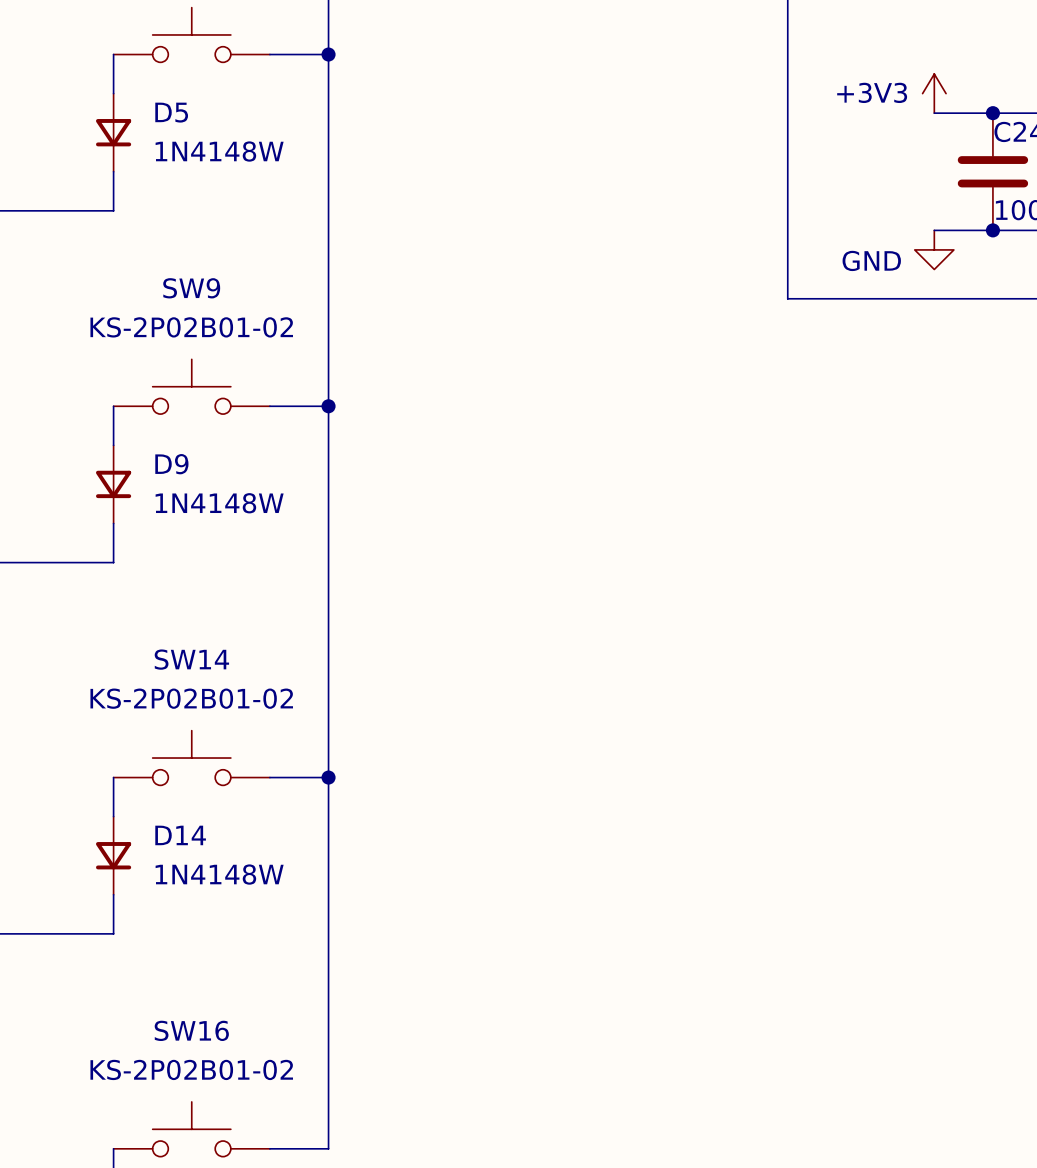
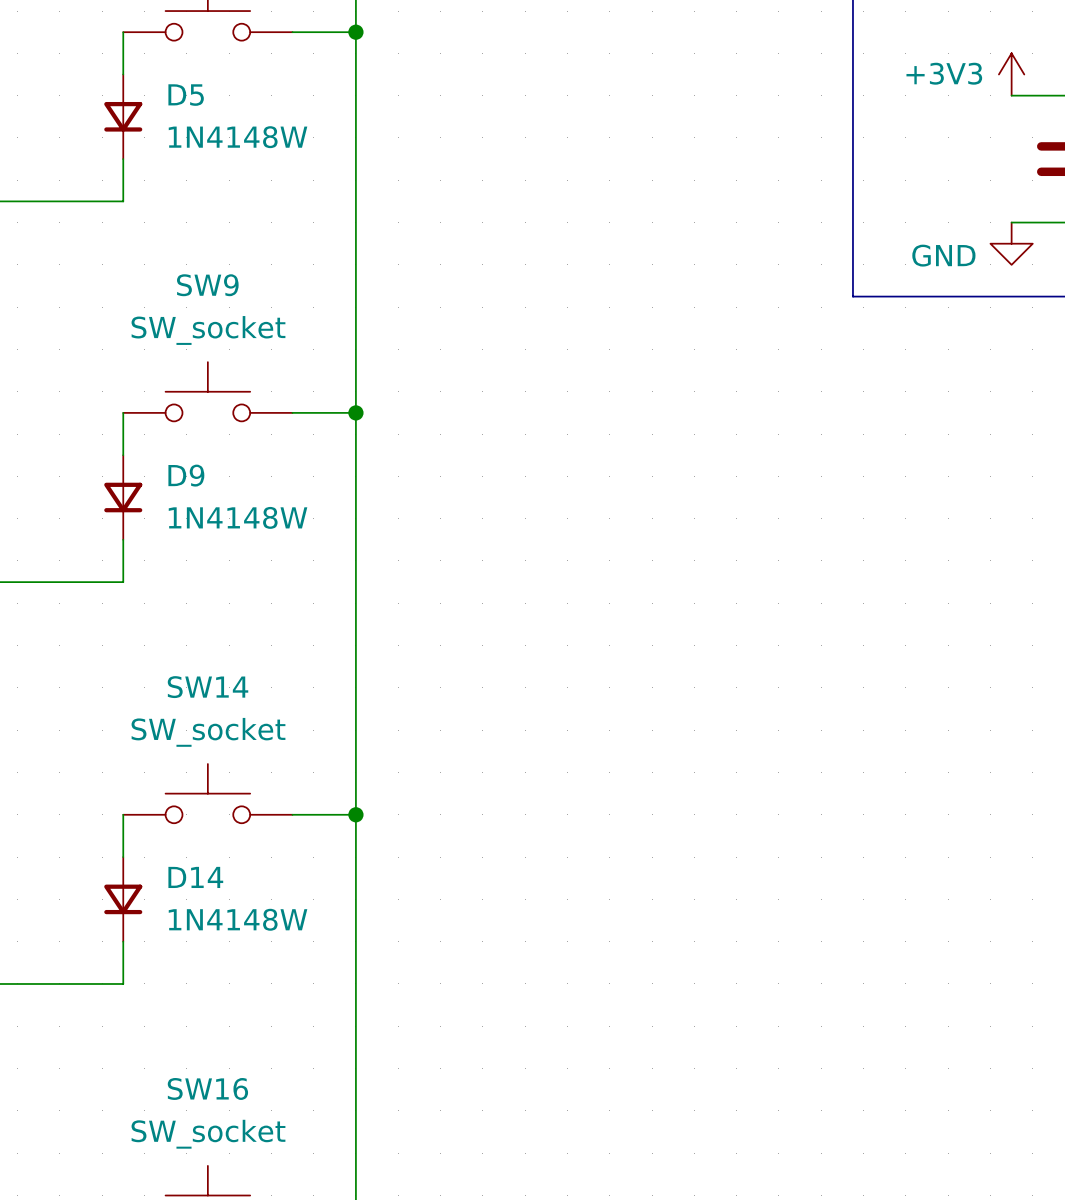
SW9 value: KS-2P02B01-02 (191, 327) -> SW_socket (208, 330)
SW14 value: KS-2P02B01-02 (191, 698) -> SW_socket (208, 732)
SW16 value: KS-2P02B01-02 (191, 1069) -> SW_socket (208, 1134)

